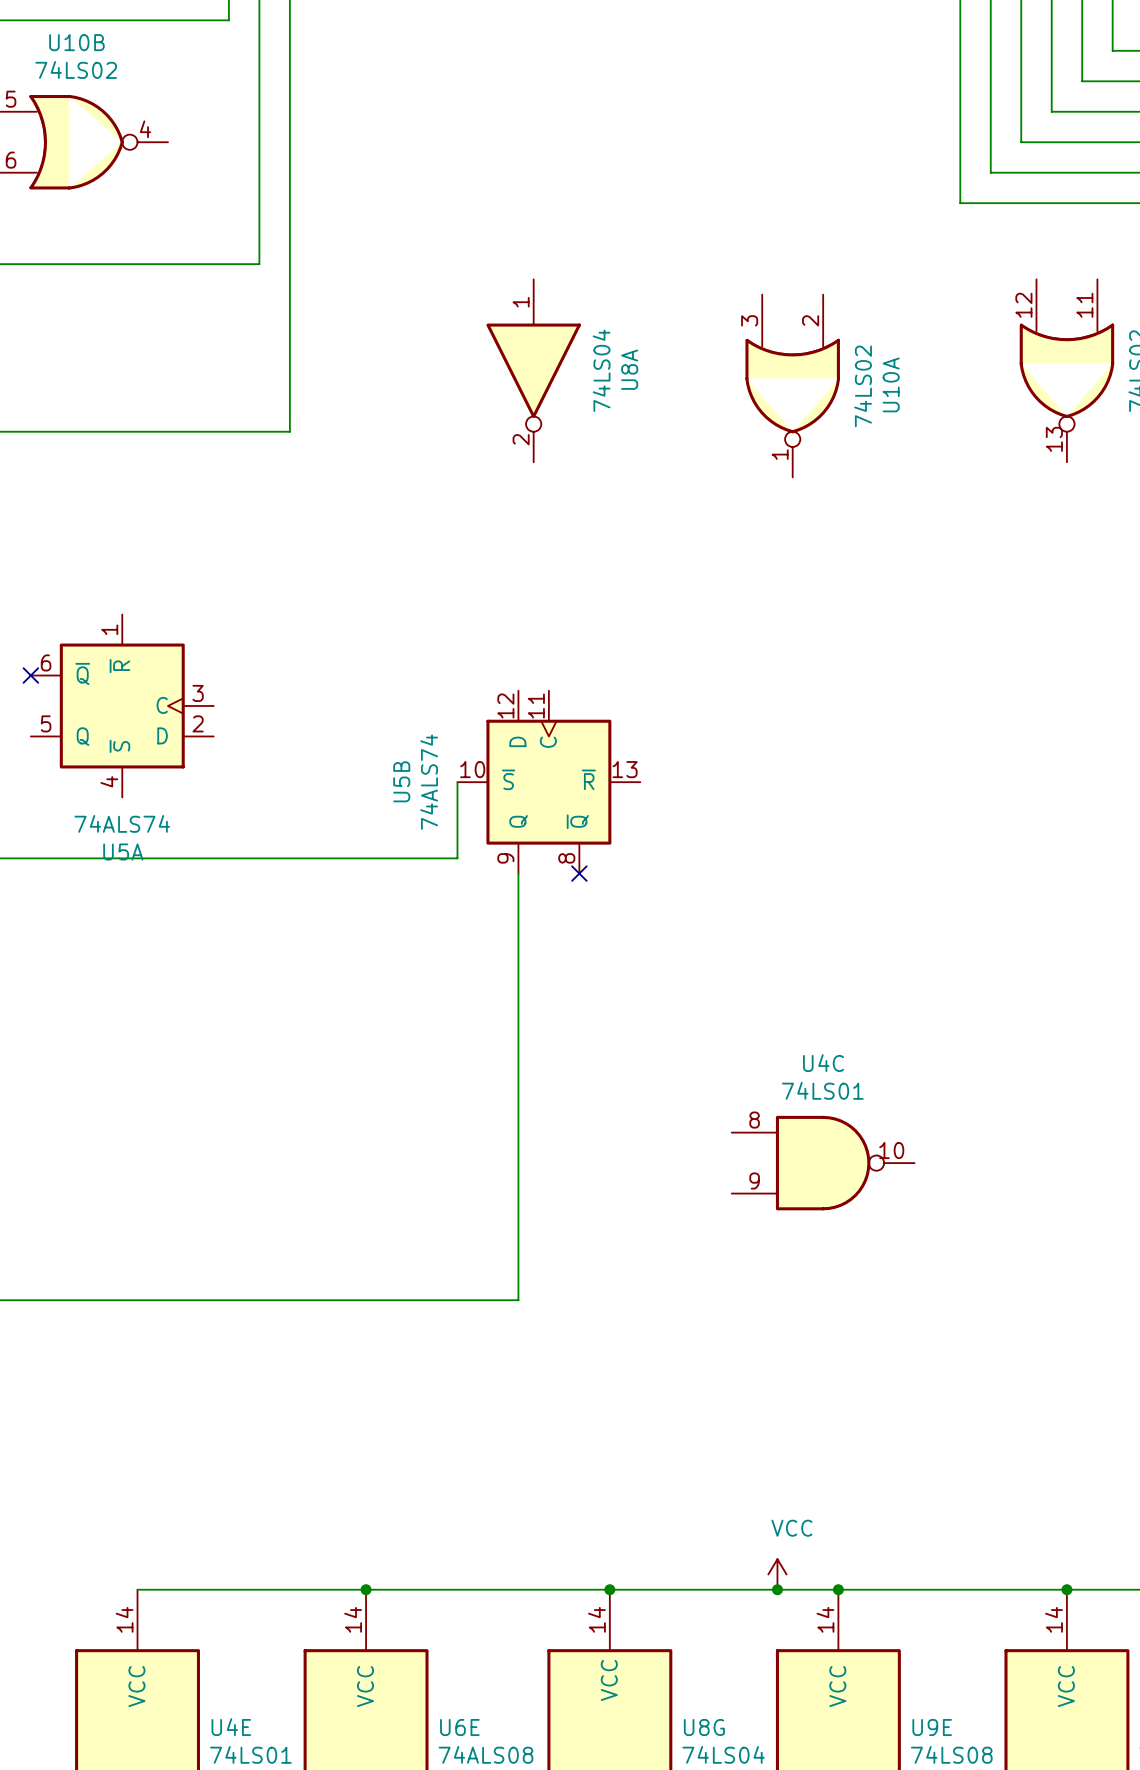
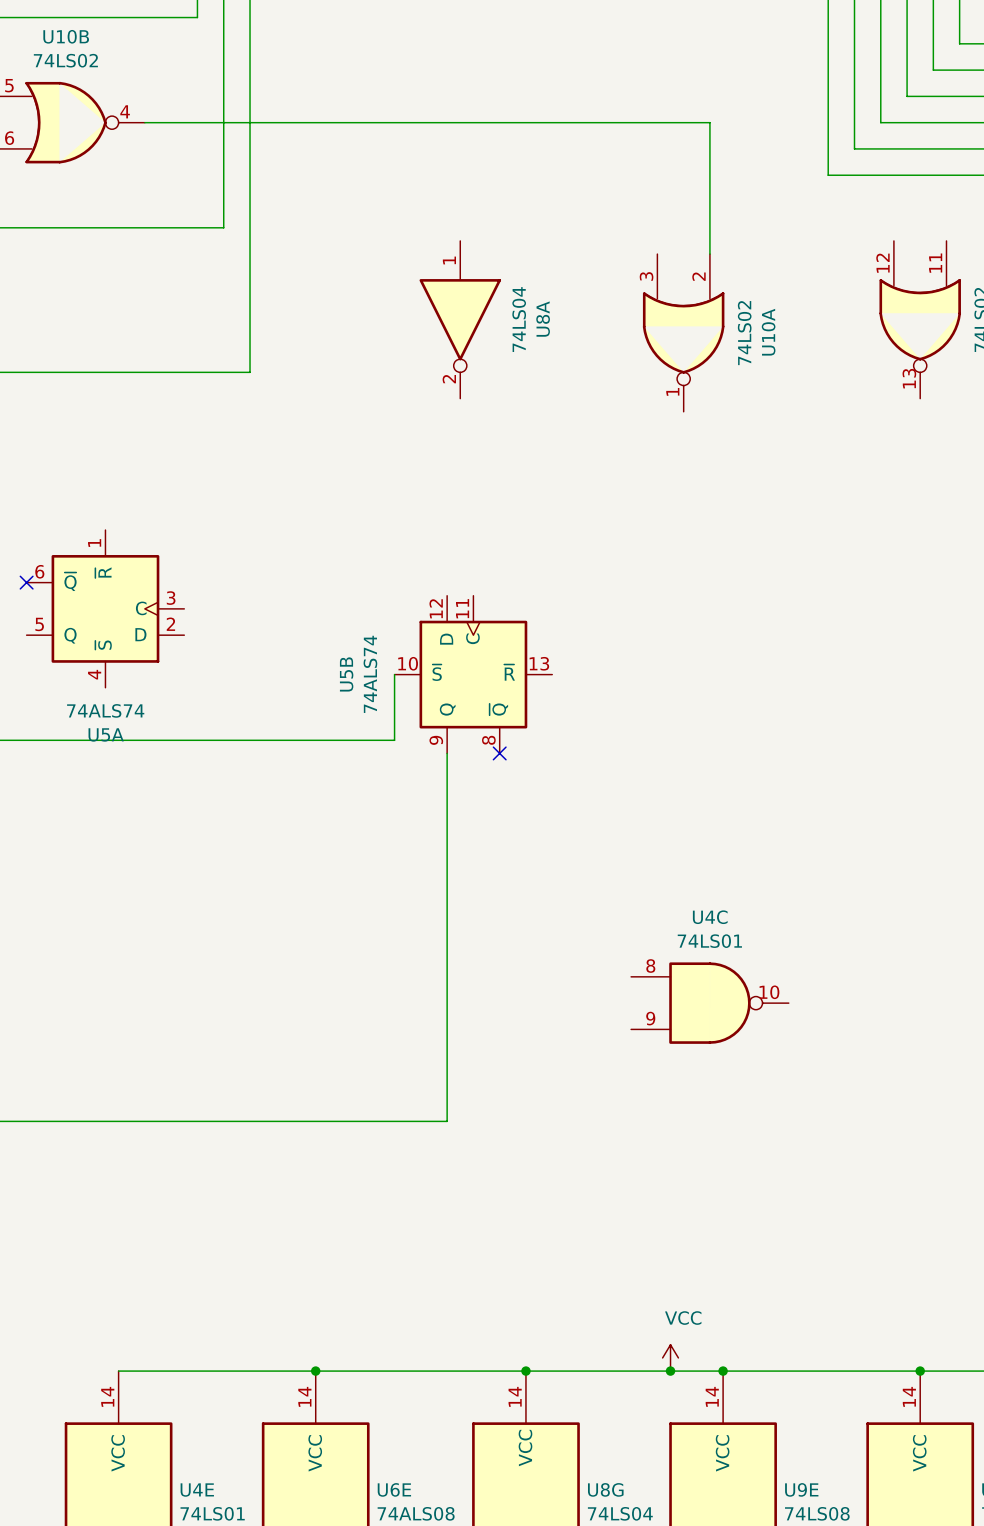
wire: none -> (144, 122) (709, 122) (709, 254)

